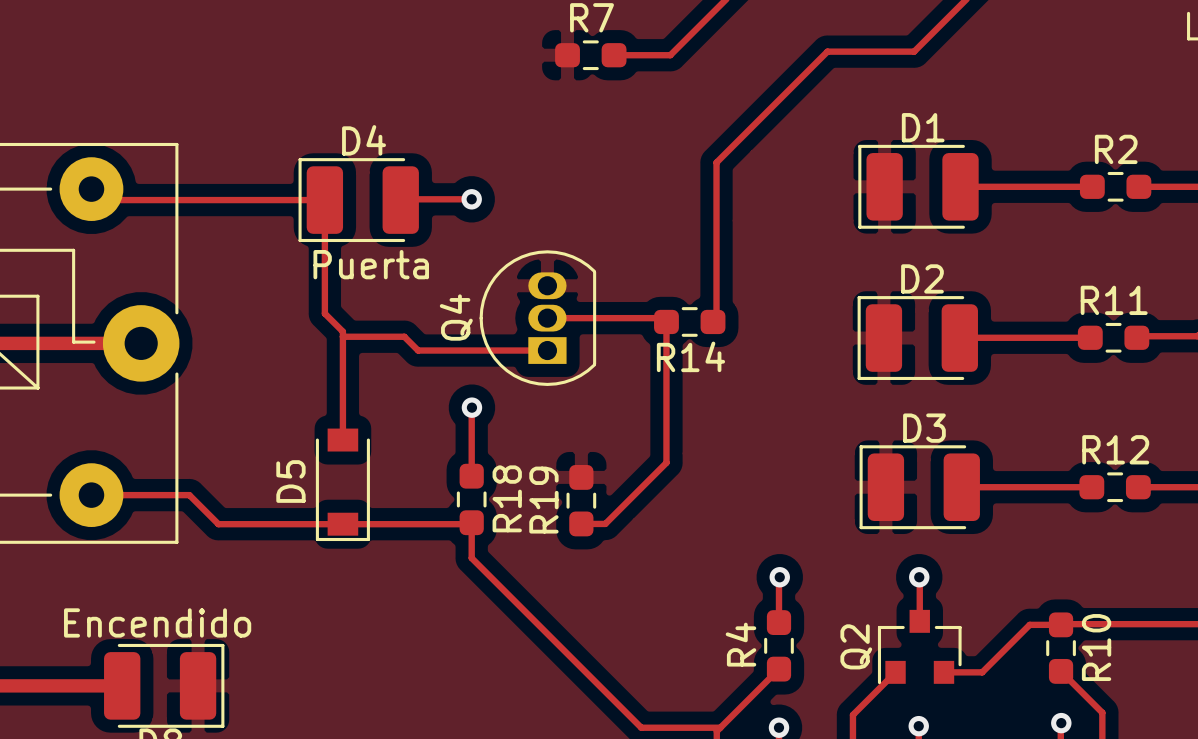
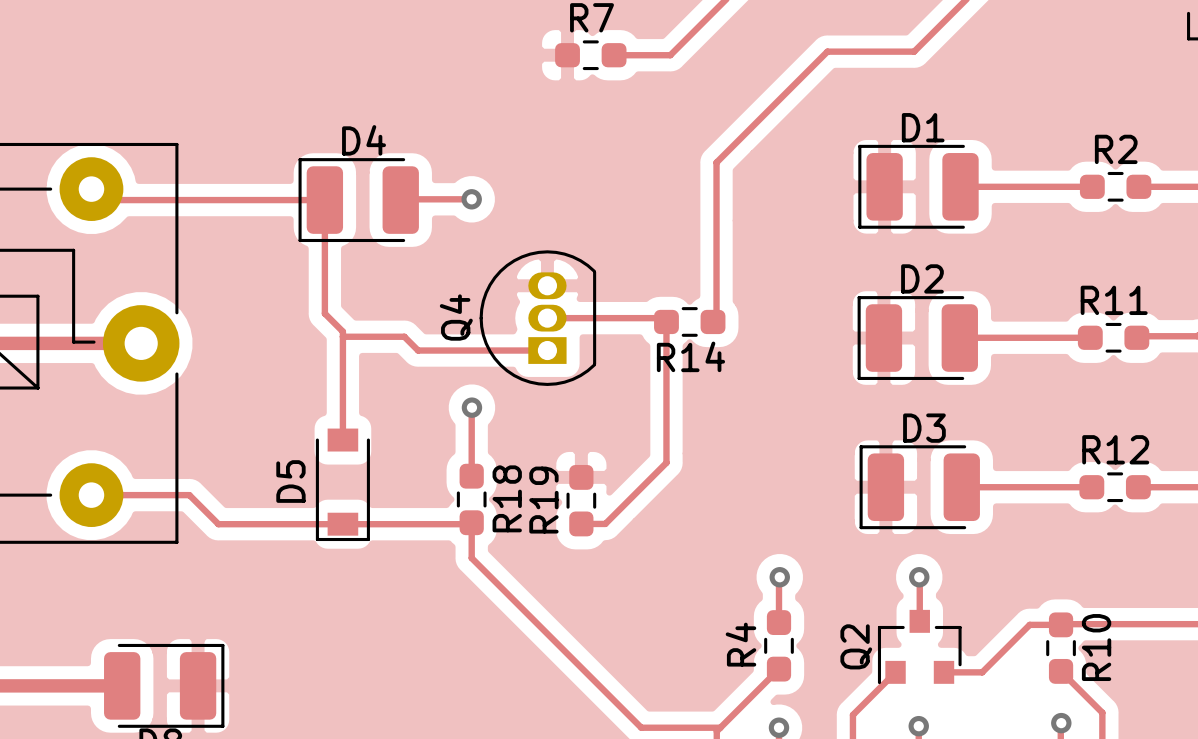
text: Puerta (371, 264) -> none
text: Encendido (157, 622) -> none

